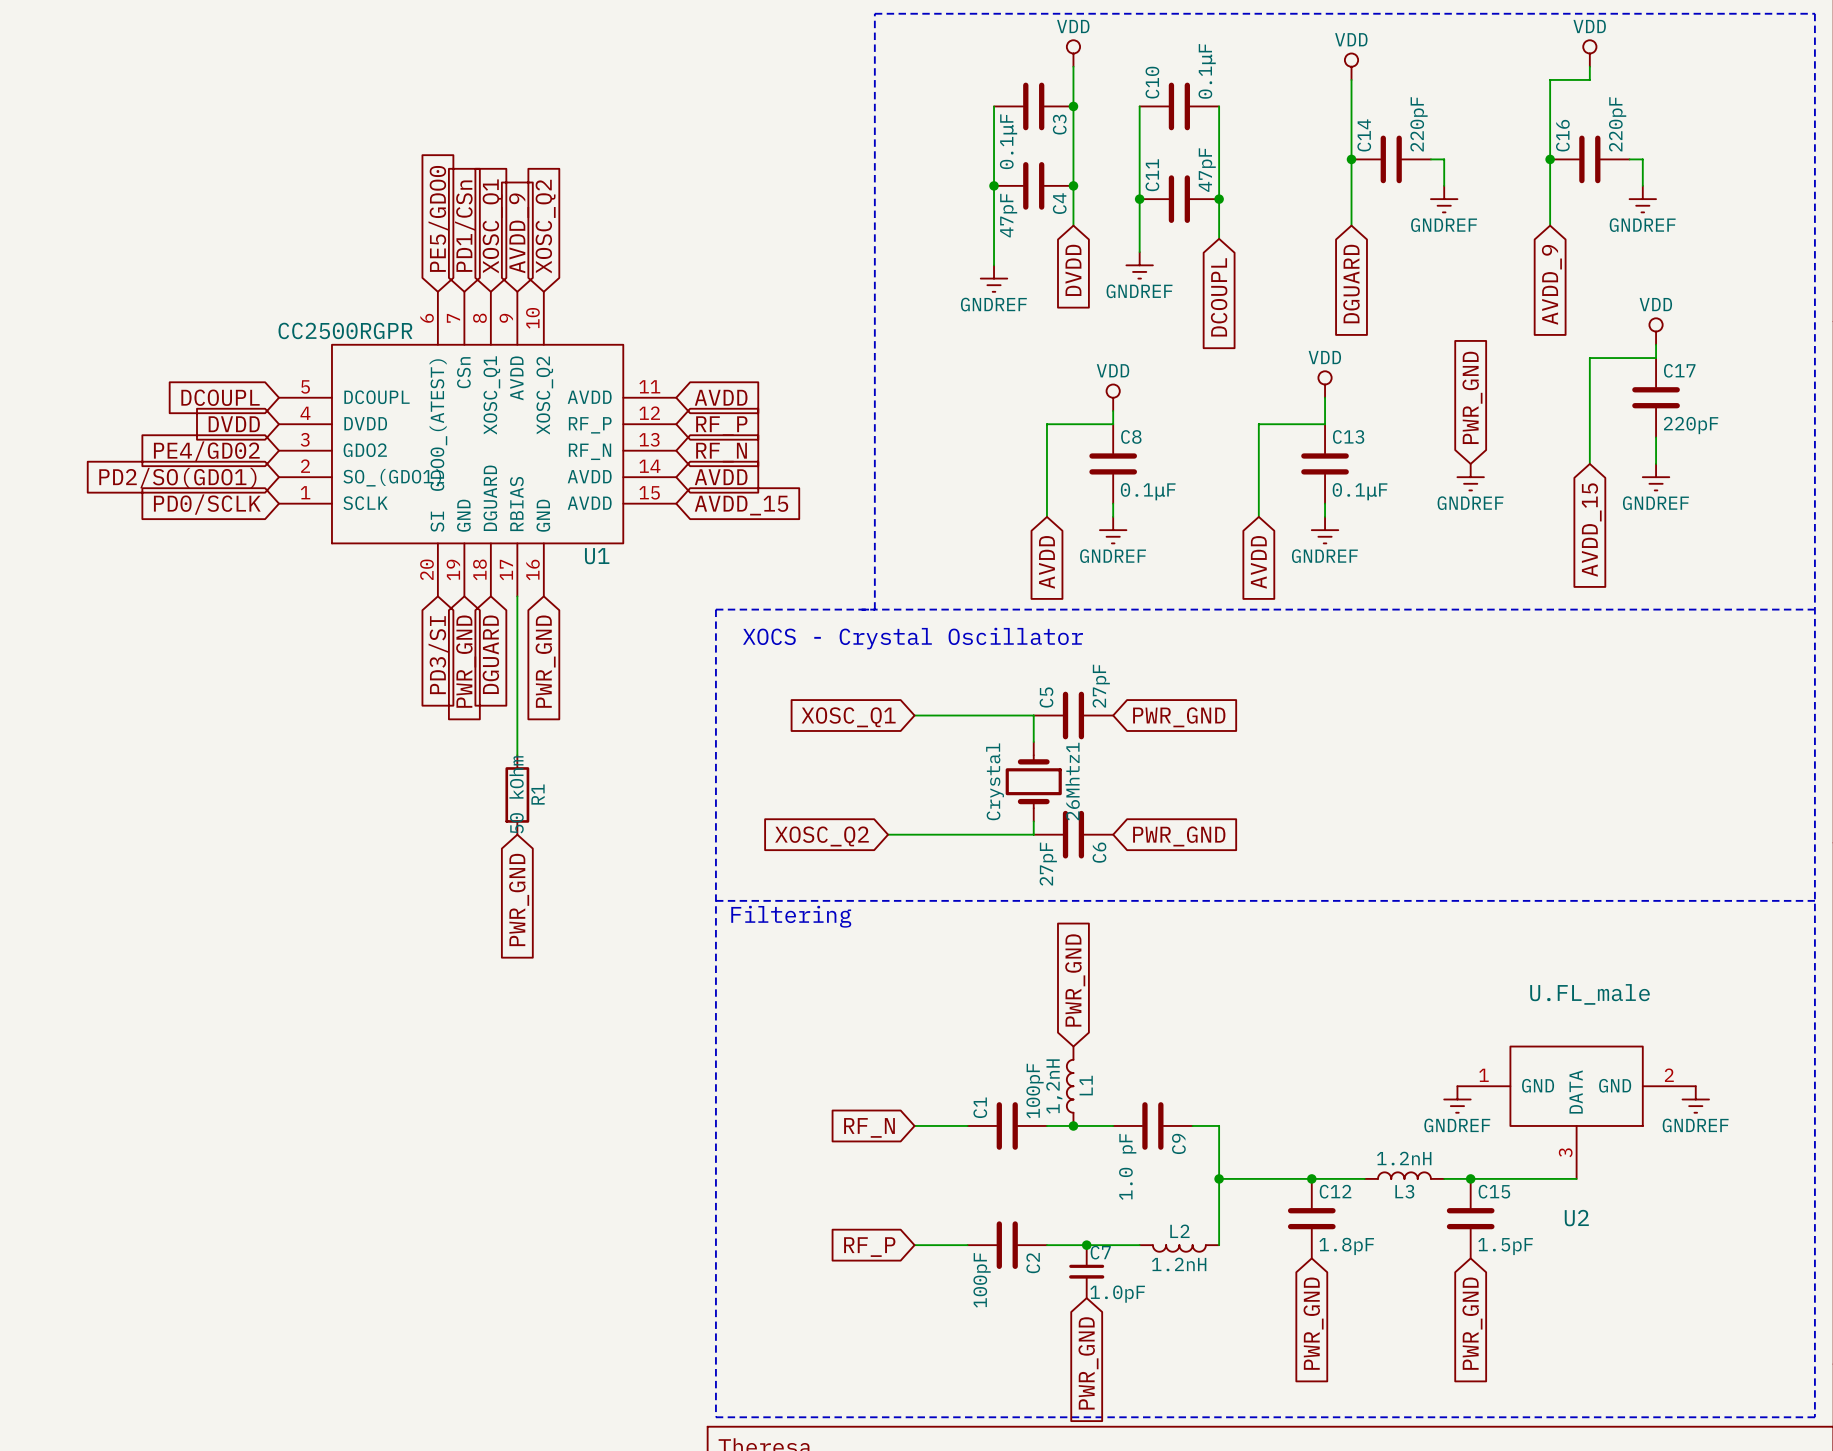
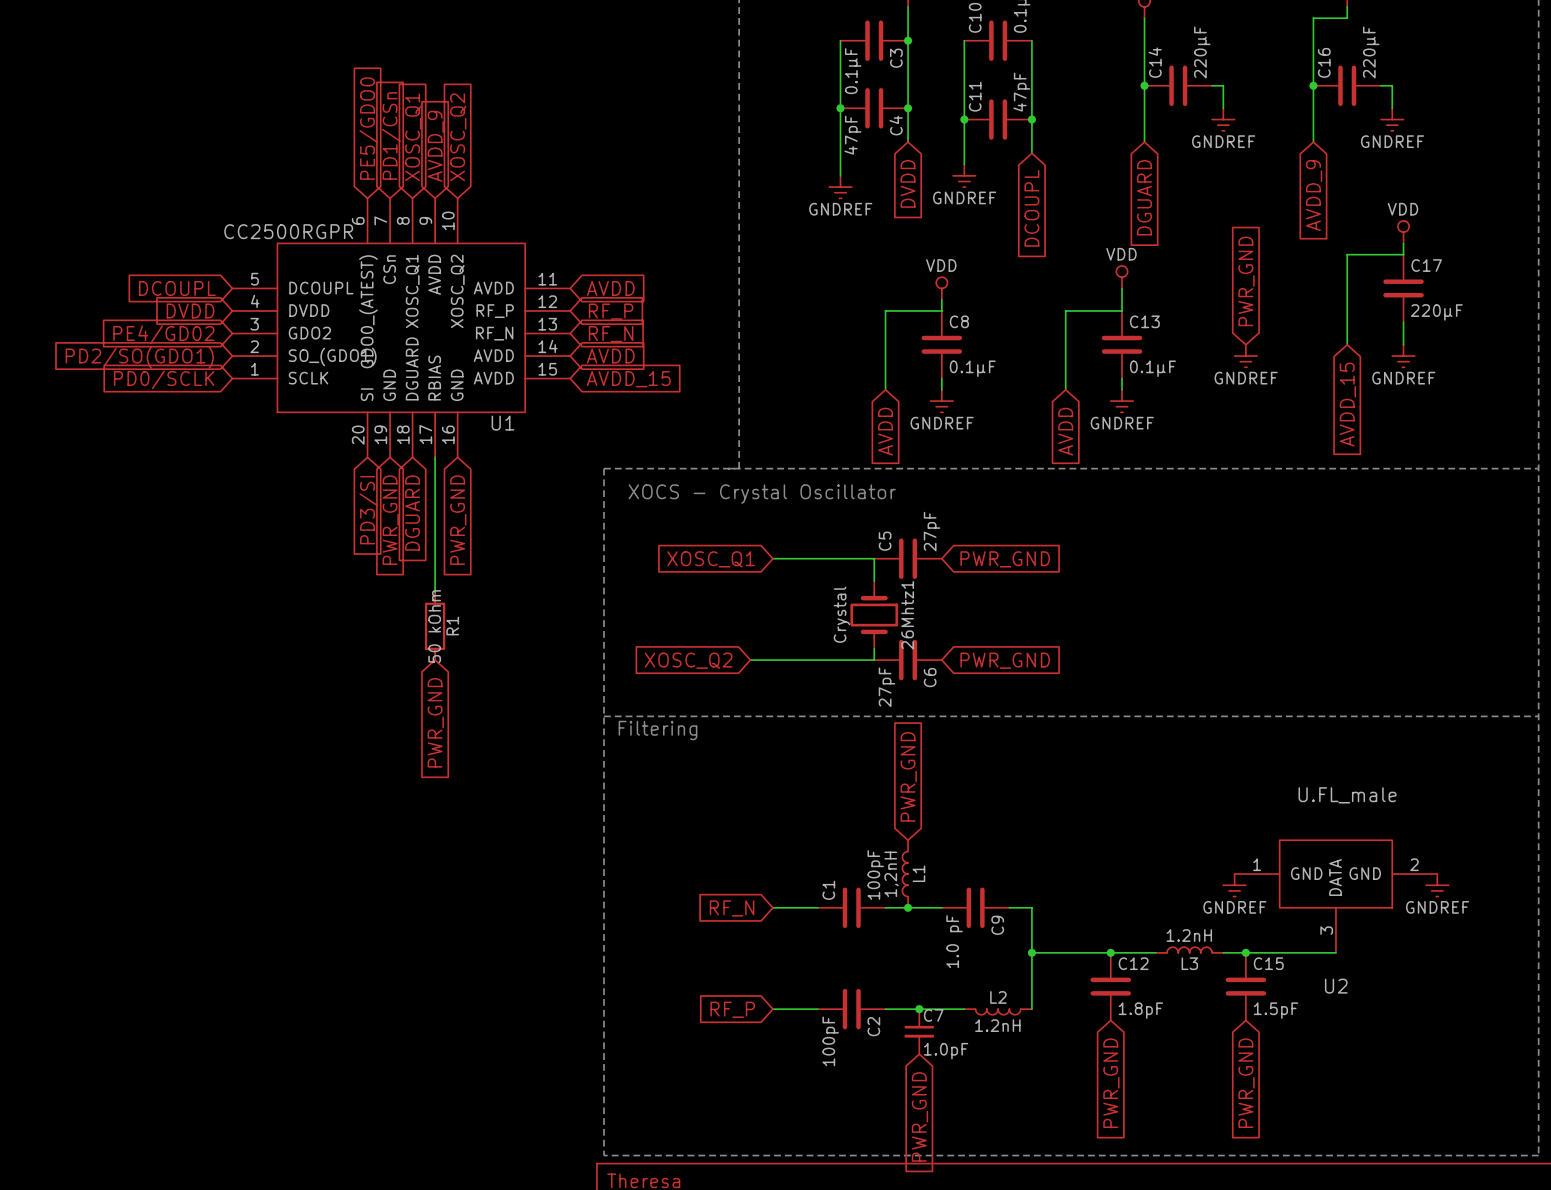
C14 value: 220pF (1419, 124) -> 220μF (1202, 52)
C16 value: 220pF (1617, 124) -> 220μF (1371, 52)
C17 value: 220pF (1691, 425) -> 220μF (1436, 312)

